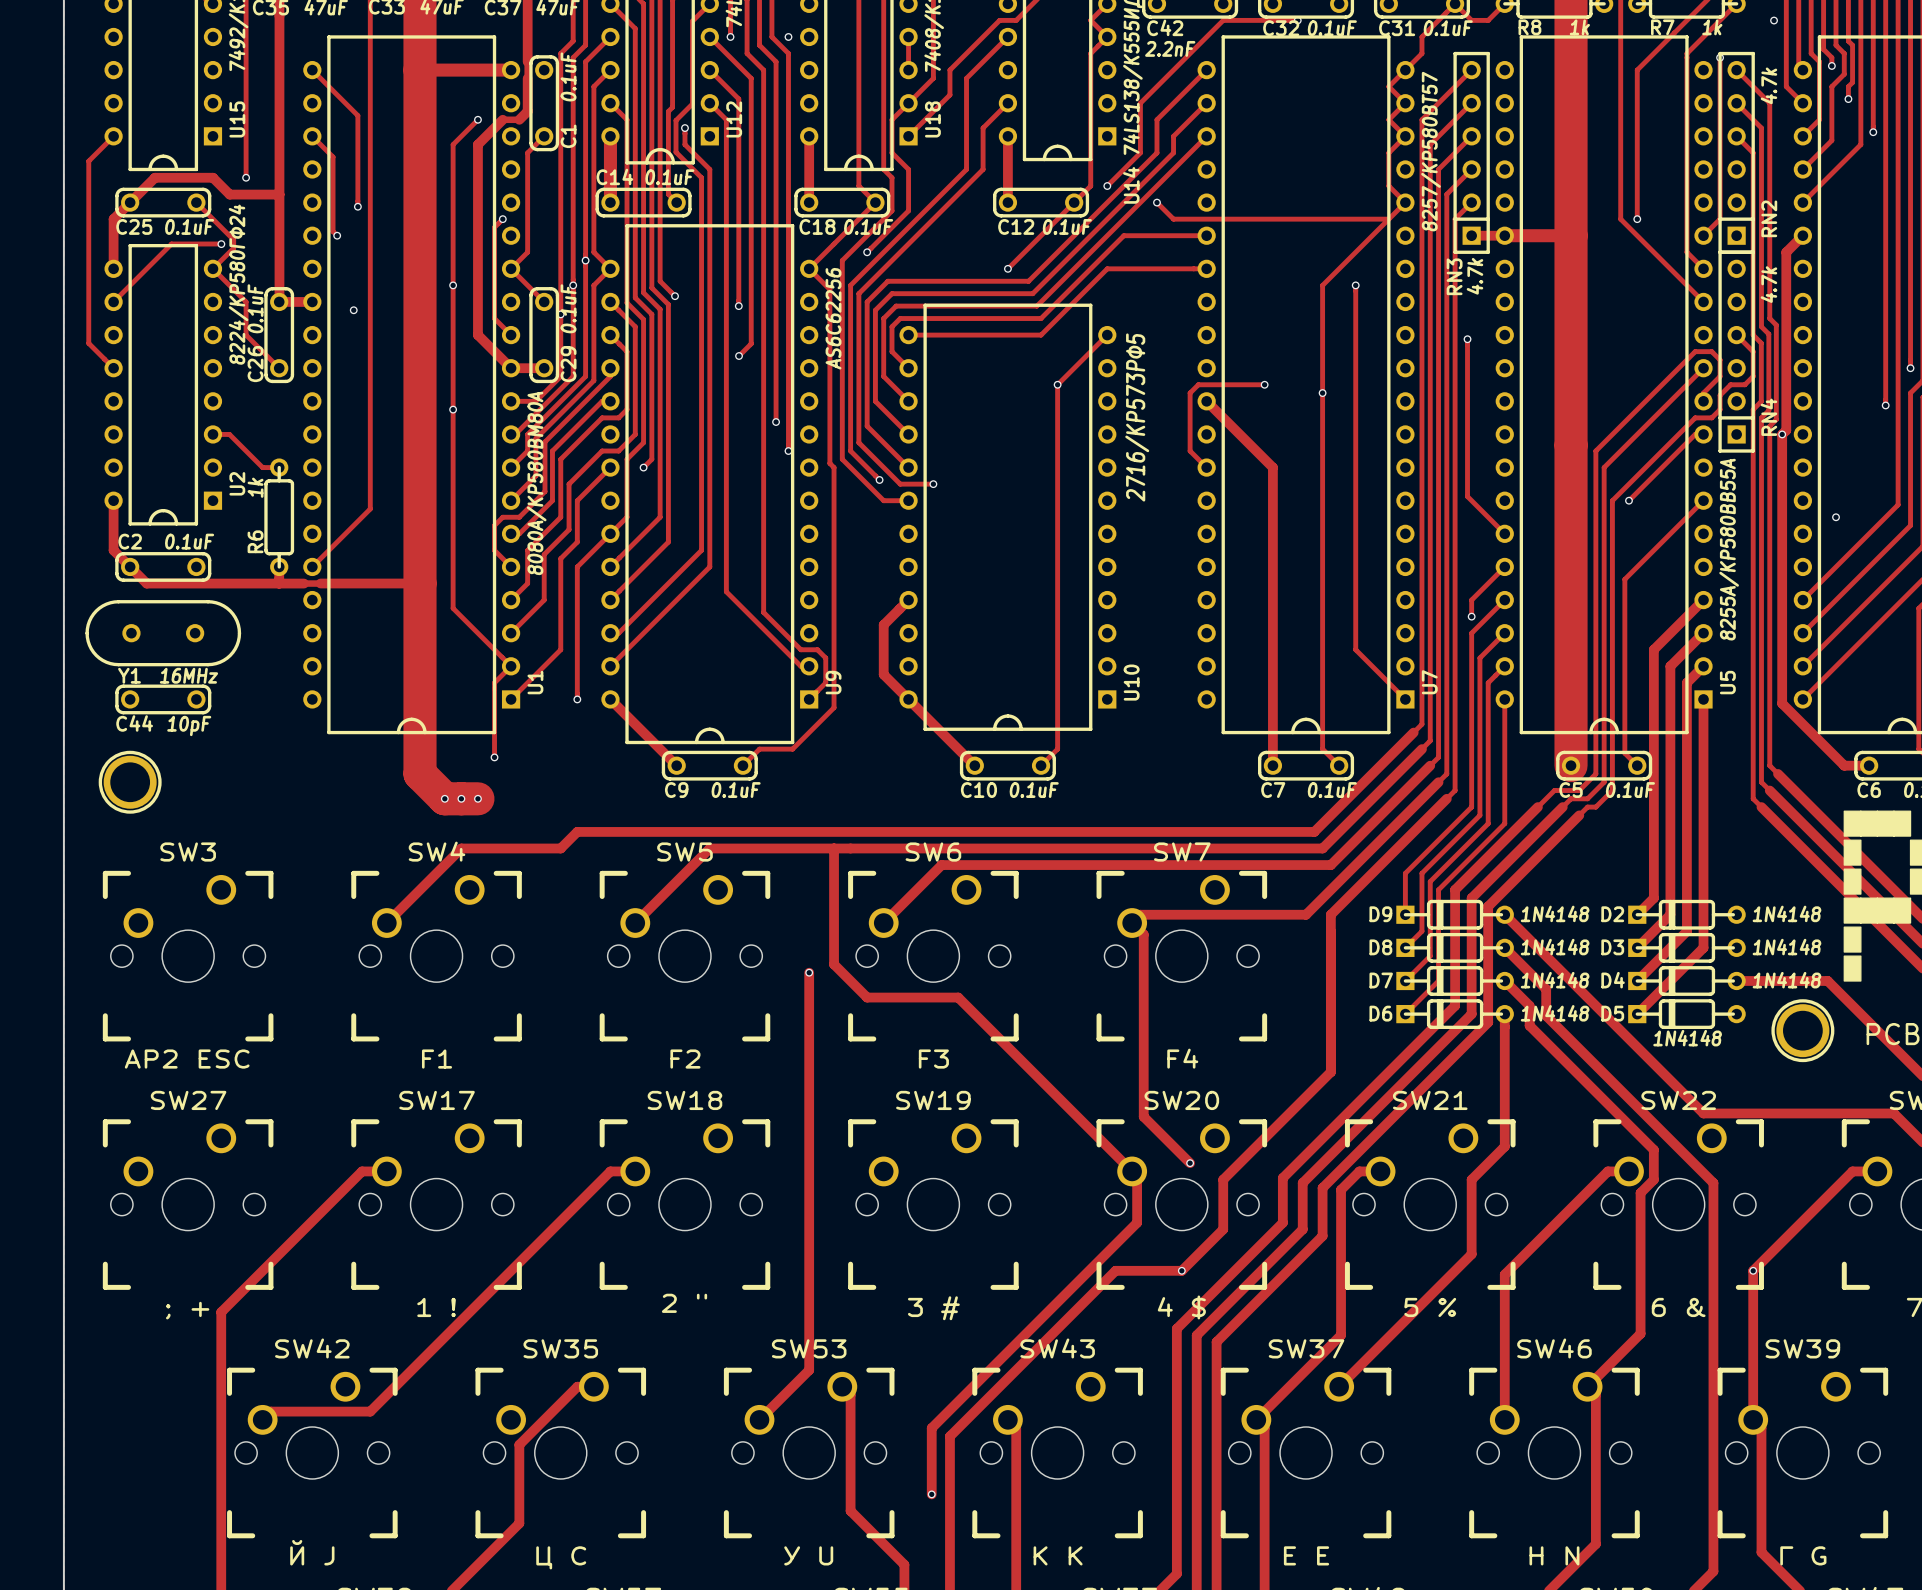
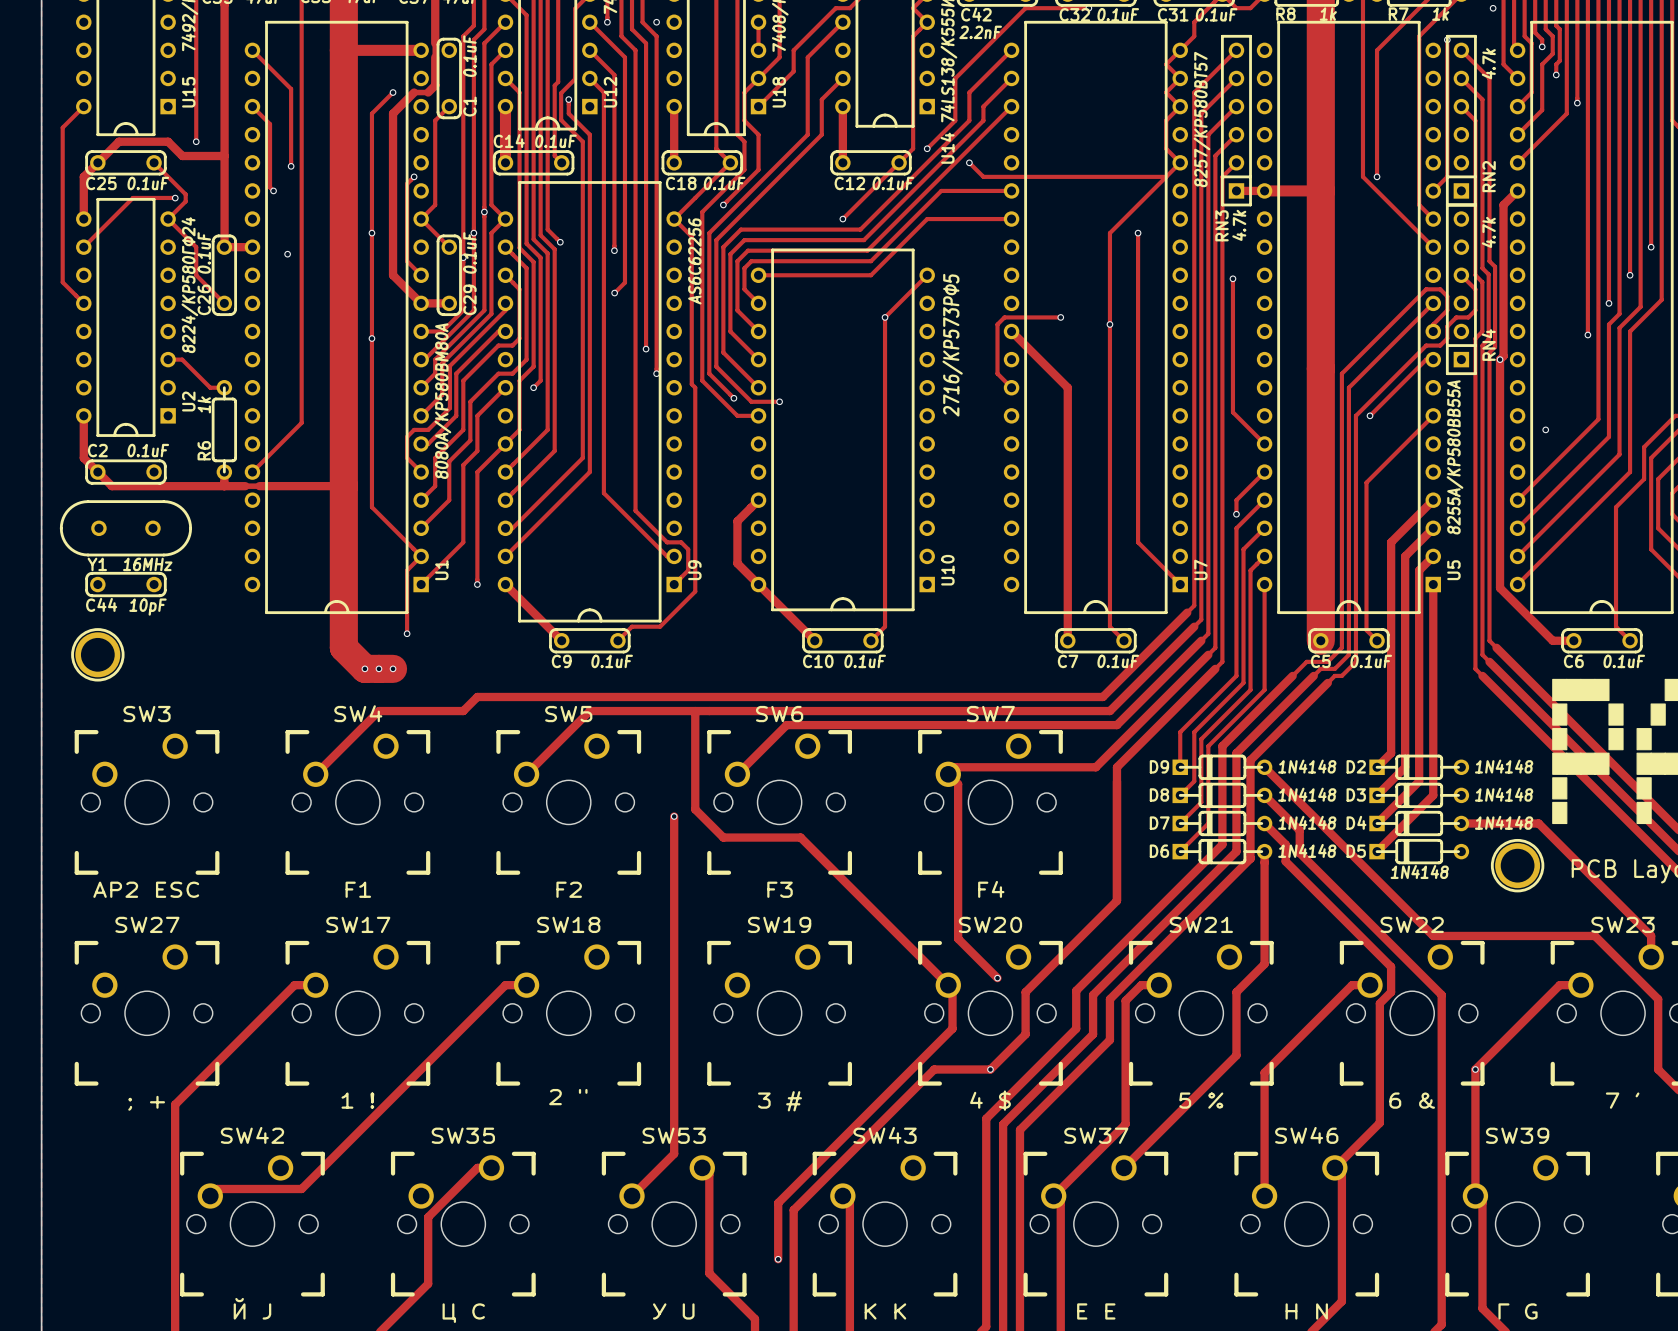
U2 value position: 8224/КР580ГФ24 (238, 284) -> 8224/КР580ГФ24 (189, 285)

